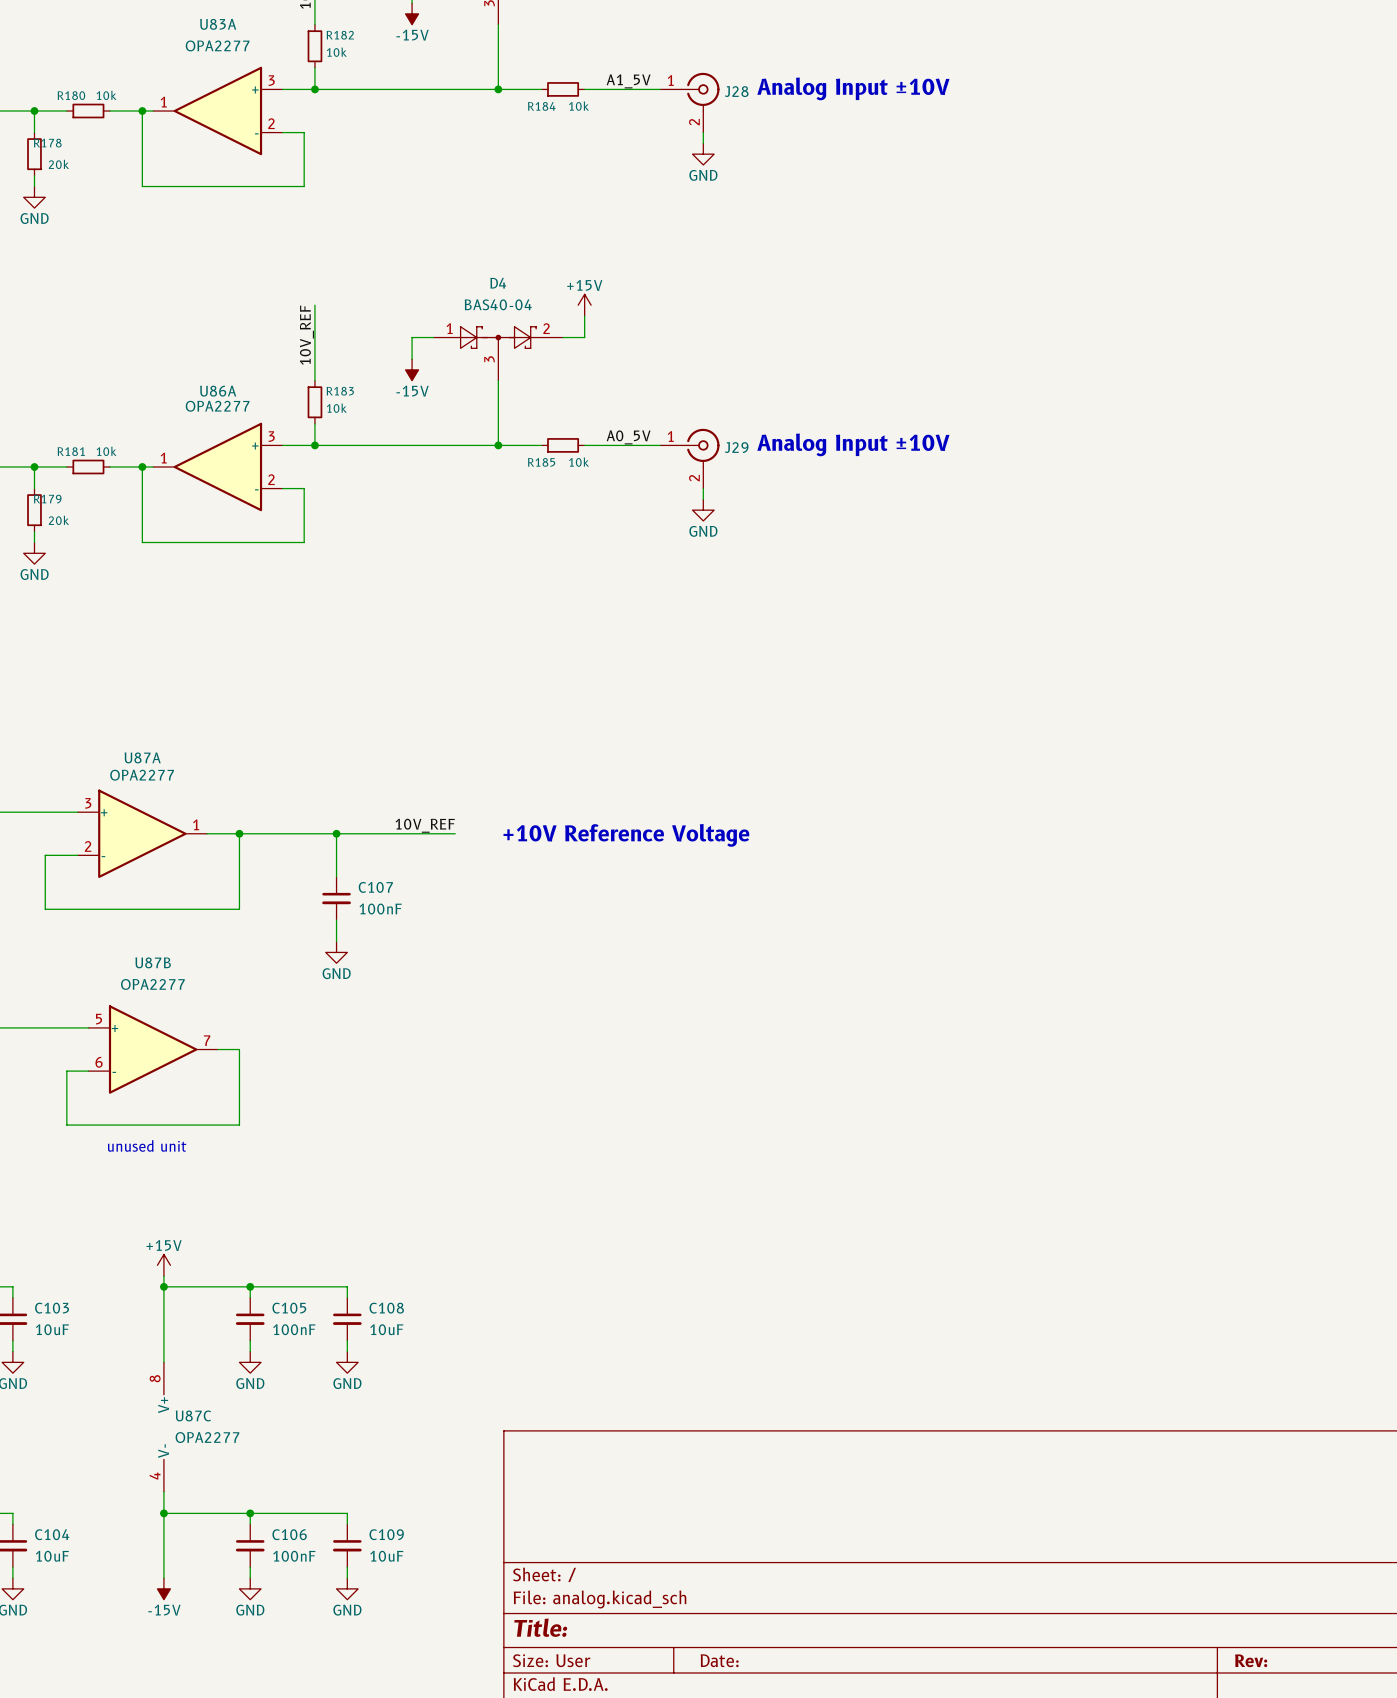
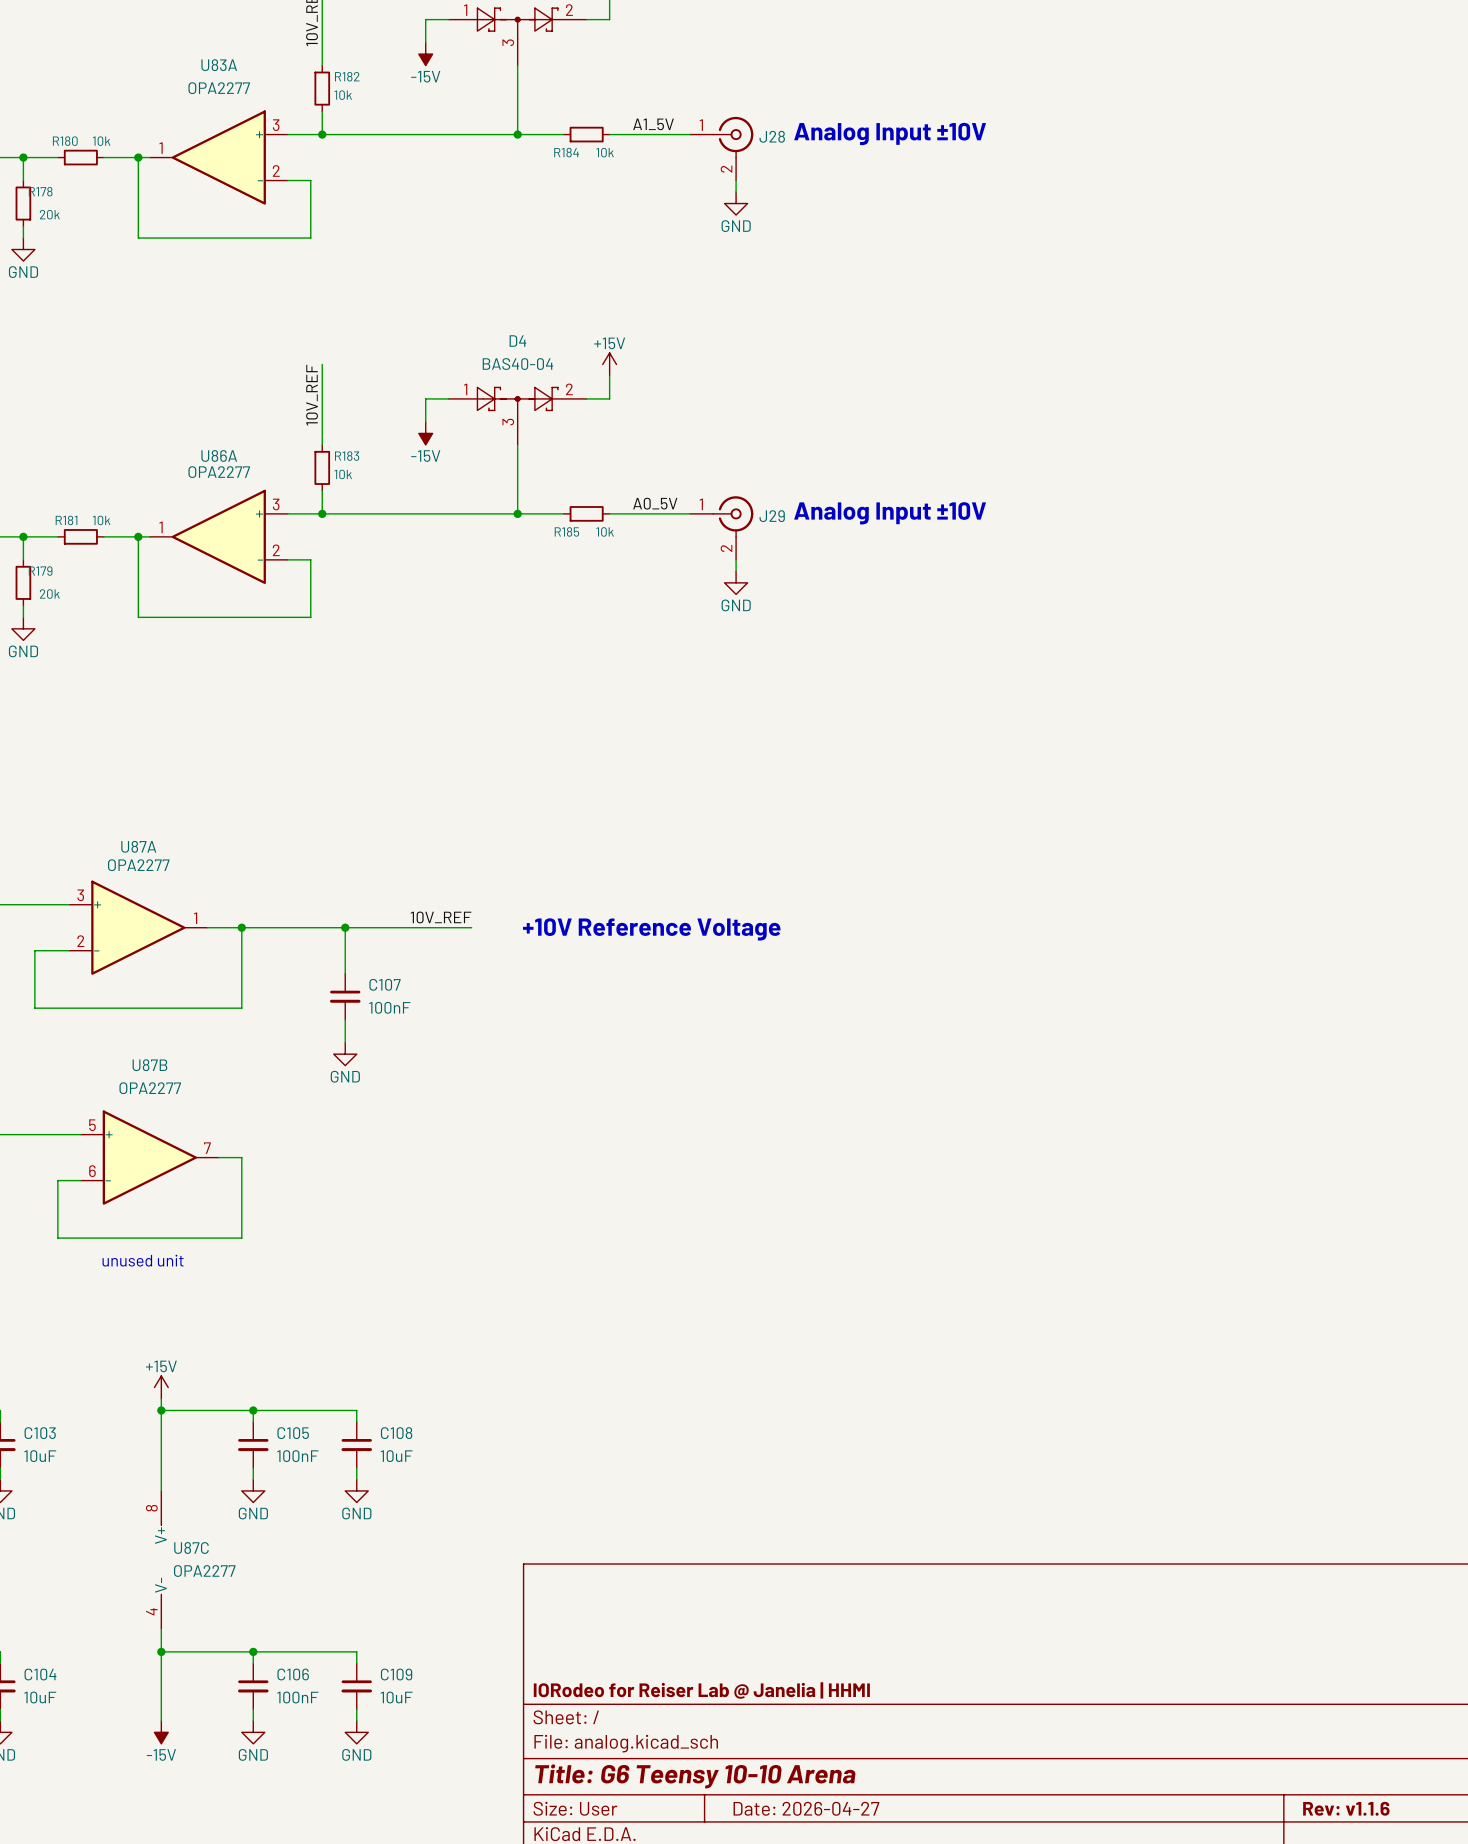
title block: none -> IORodeo for Reiser Lab @ Janelia | HHMI (701, 1690)
title block: Title: (540, 1627) -> Title: G6 Teensy 10-10 Arena (695, 1776)
title block: Date: (719, 1660) -> Date: 2026-04-27 (806, 1808)
title block: Rev: (1251, 1660) -> Rev: v1.1.6 (1346, 1808)

